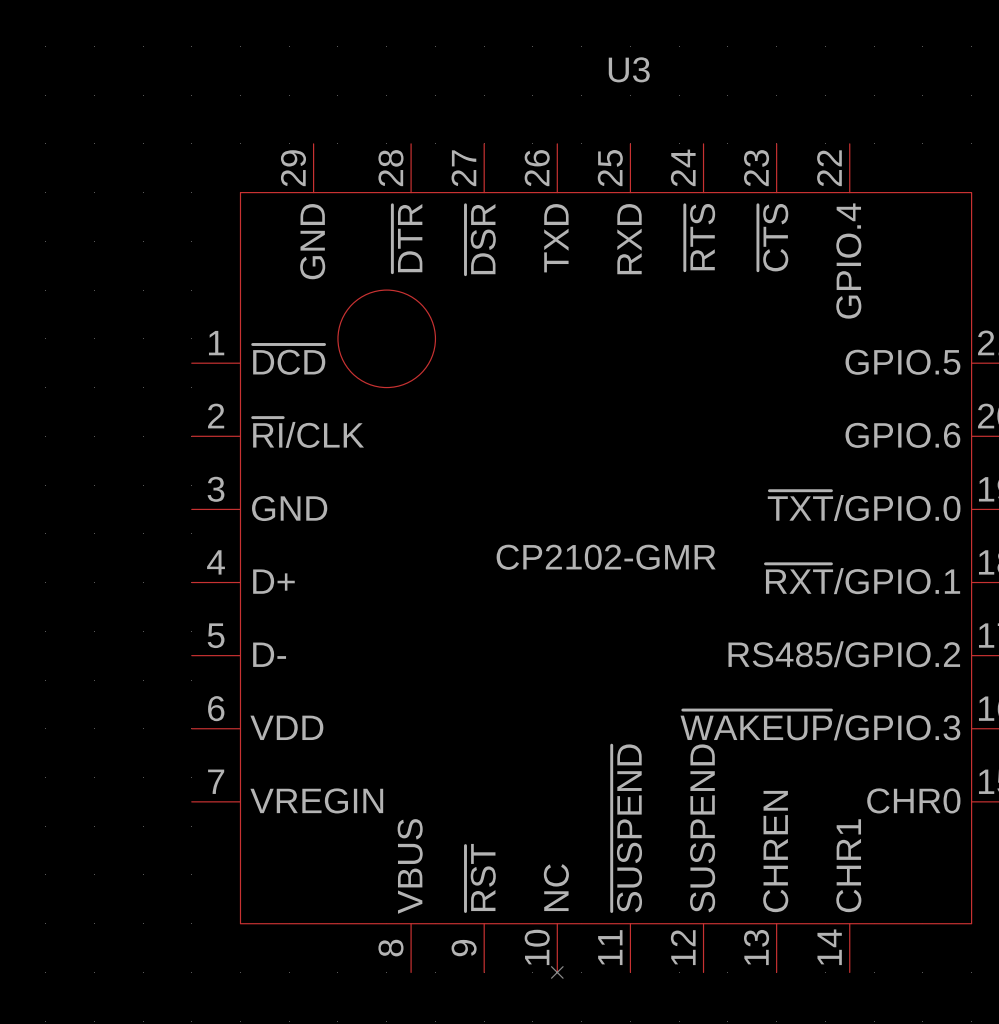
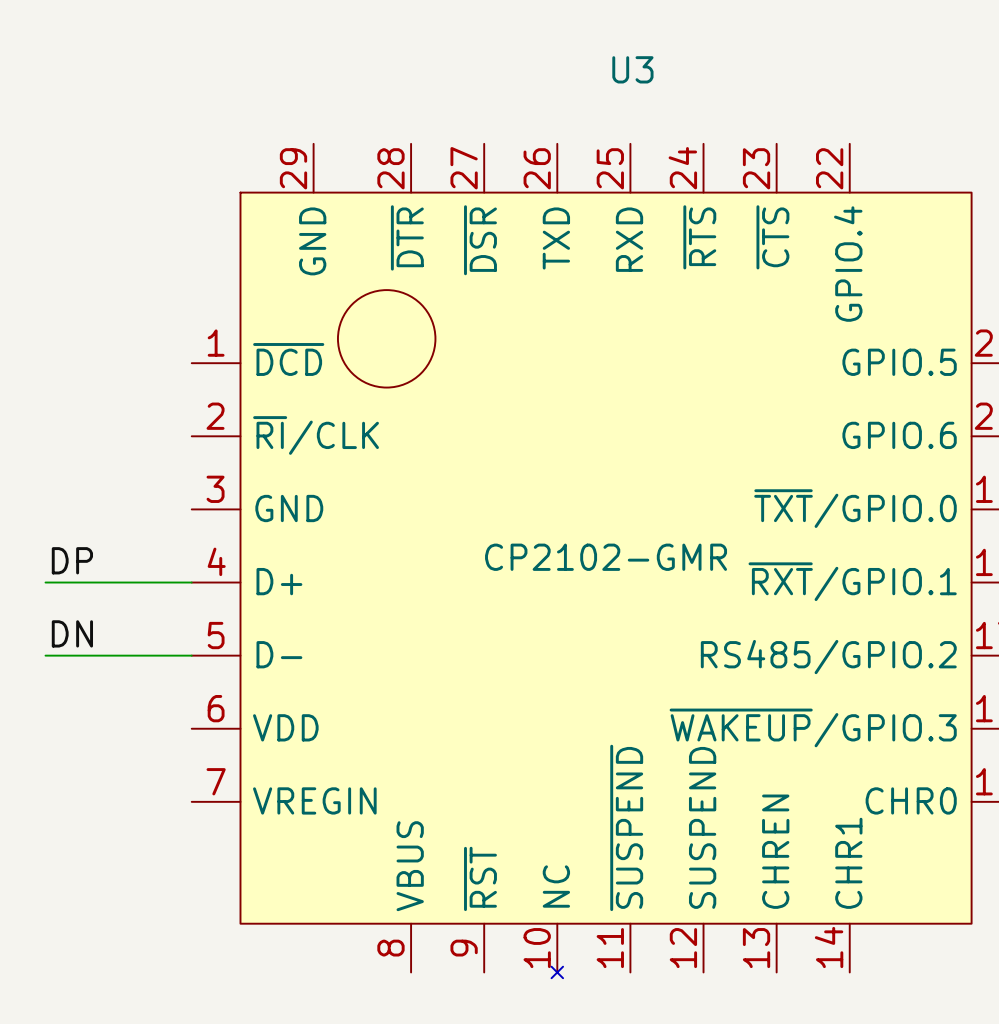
label: none -> DP (72, 560)
wire: none -> (45, 582) (191, 582)
label: none -> DN (72, 633)
wire: none -> (45, 655) (191, 655)

